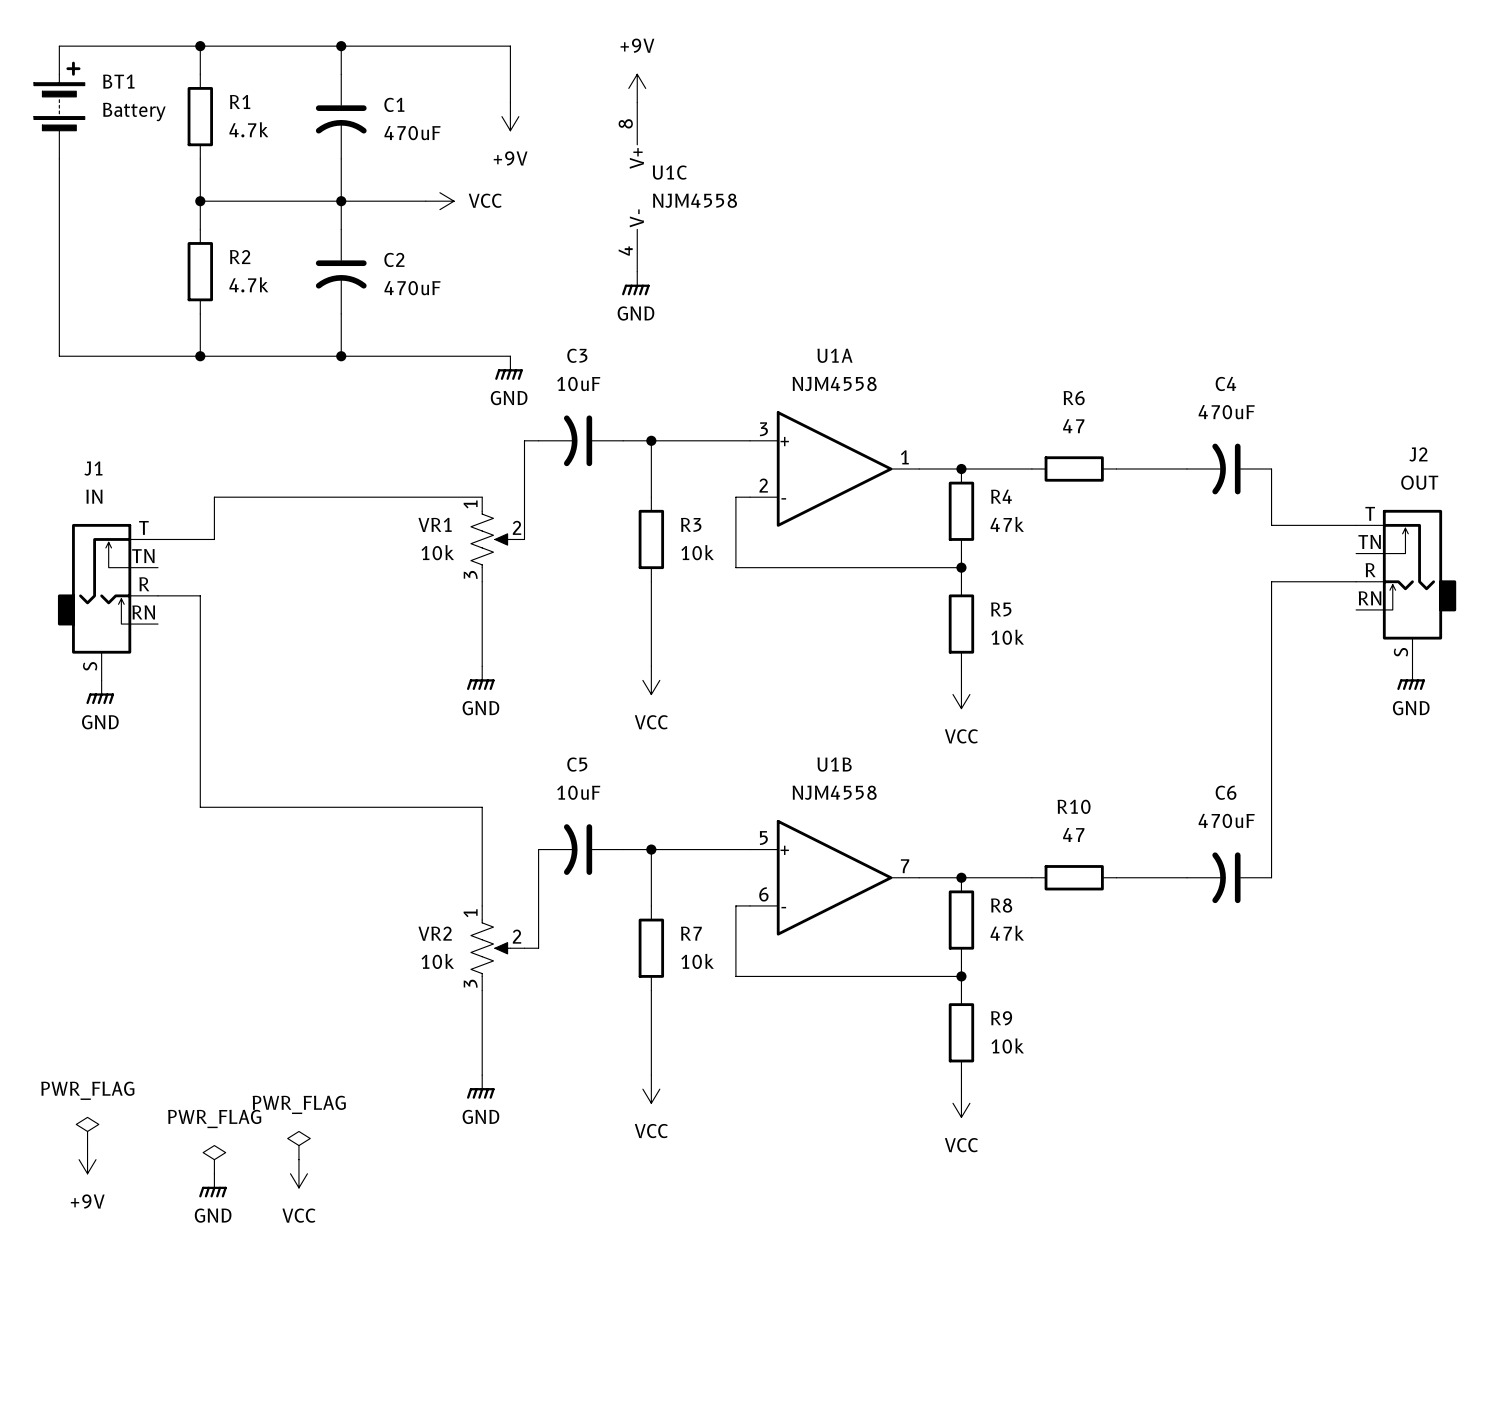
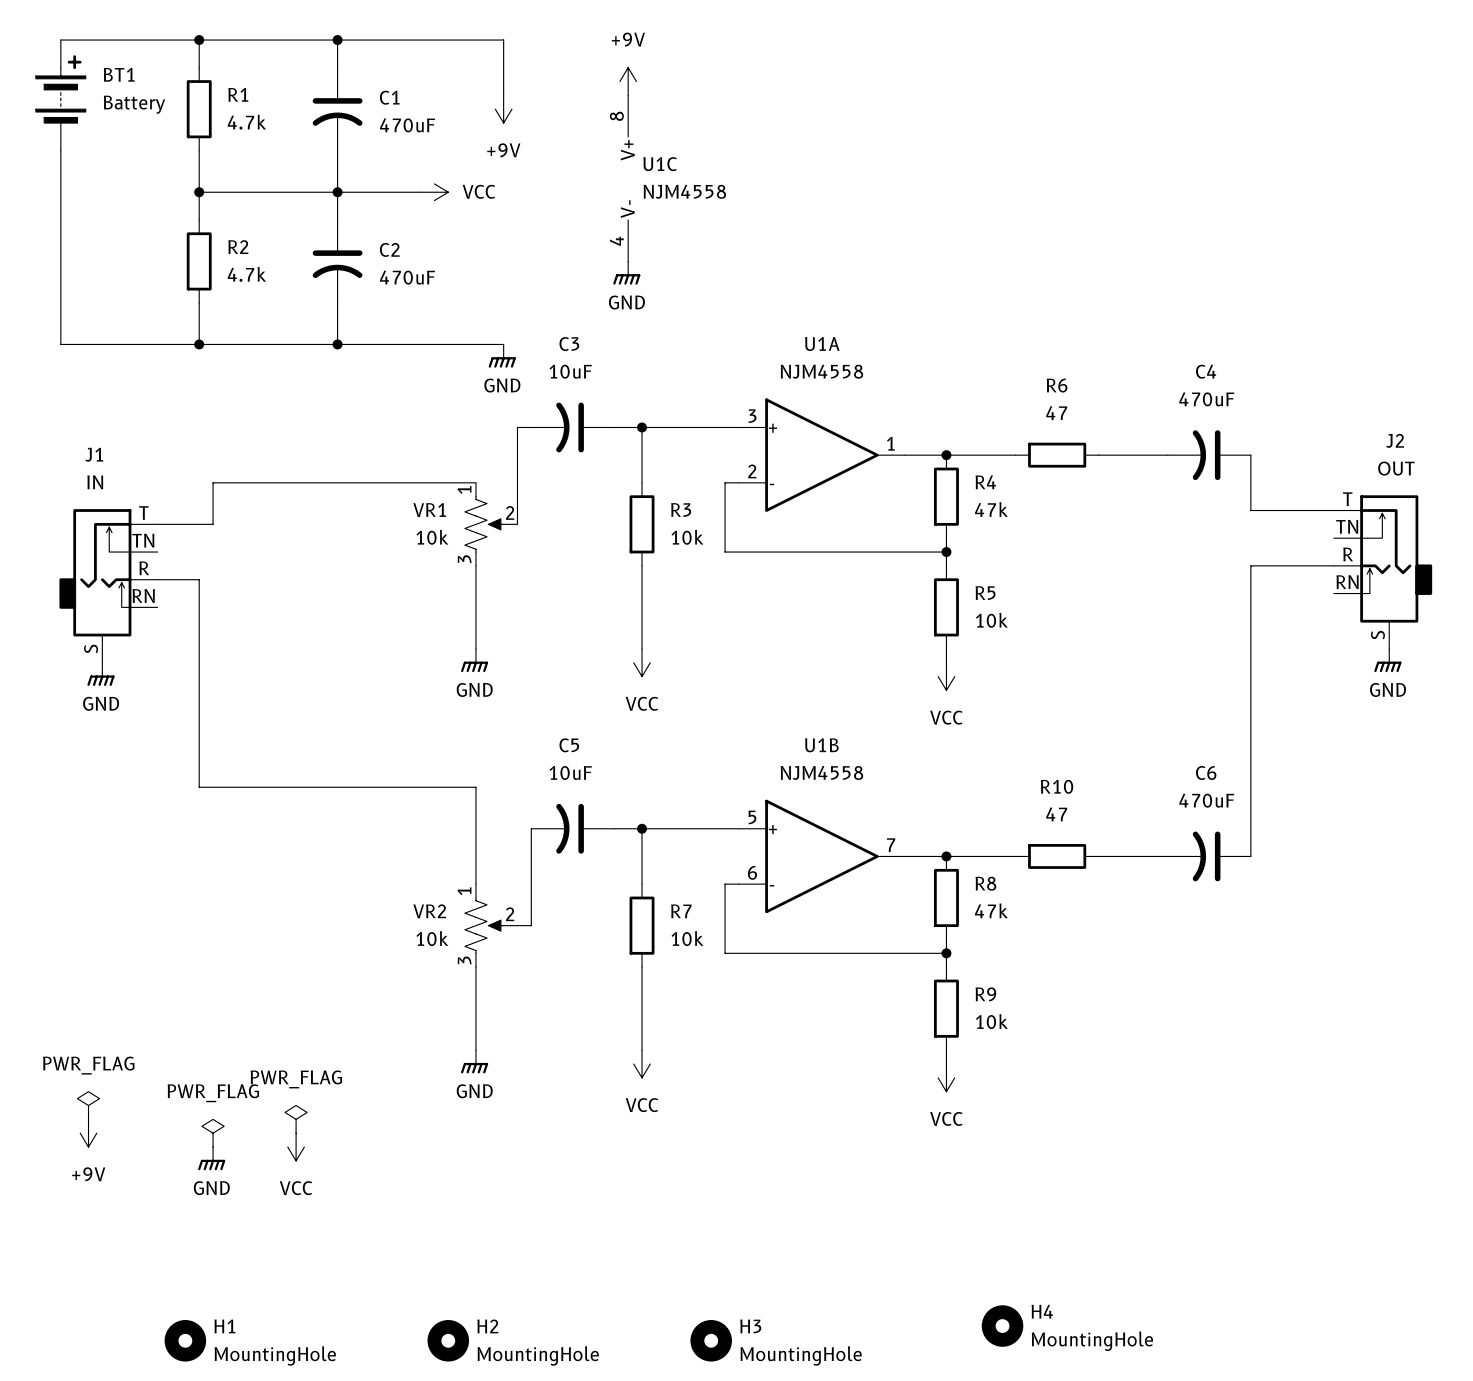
H4: none -> MountingHole (1002, 1326)
H1: none -> MountingHole (185, 1340)
H2: none -> MountingHole (448, 1340)
H3: none -> MountingHole (711, 1340)

